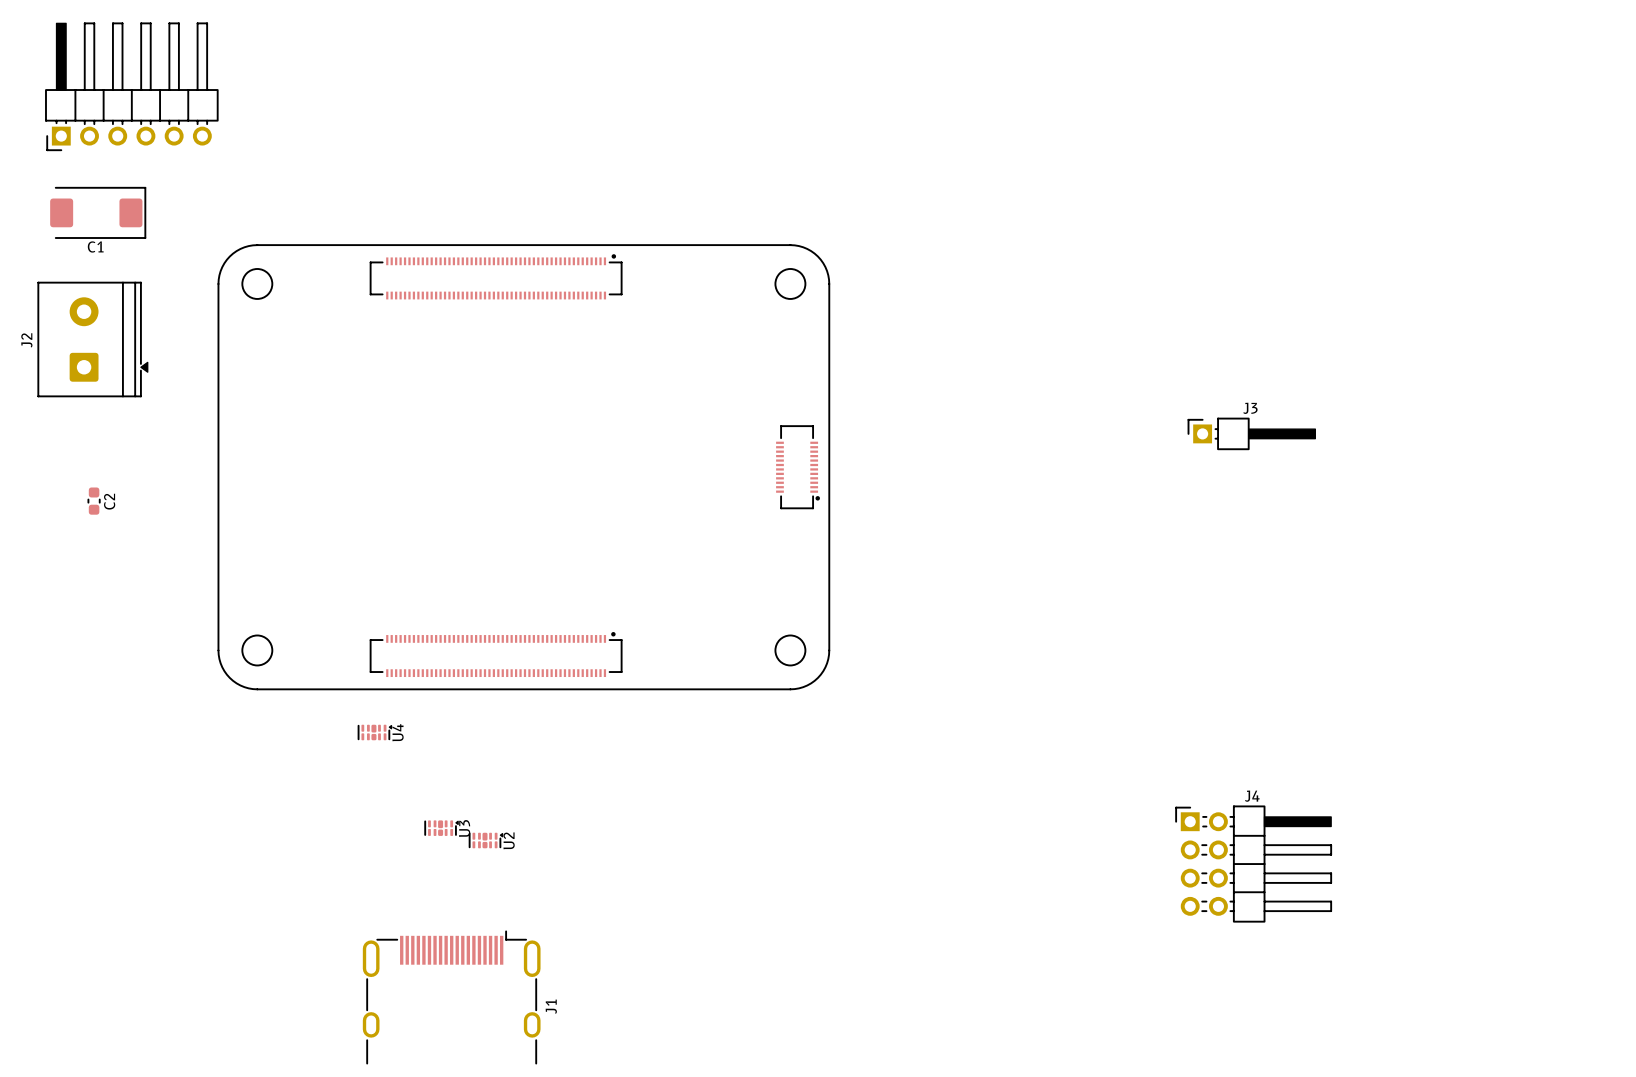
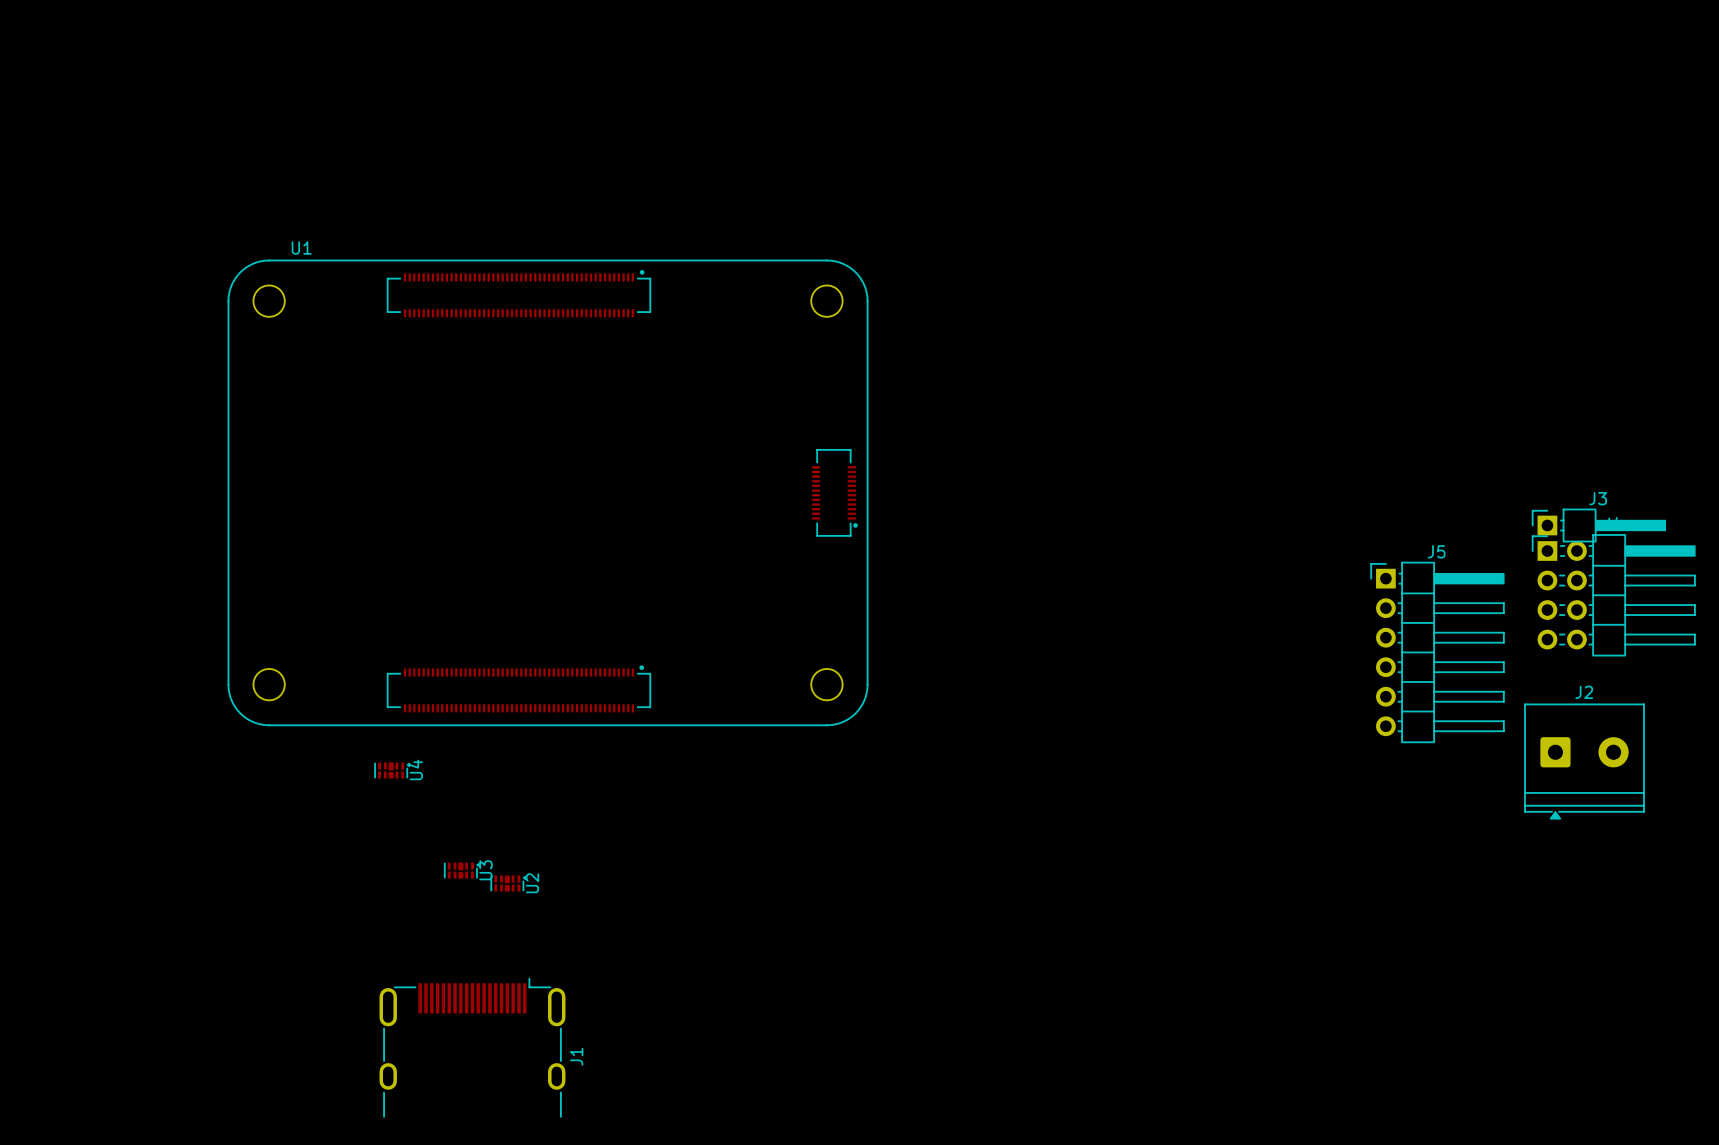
part: (131, 86) -> none
C1: (98, 212) -> none
U1 name: none -> U1 (301, 248)
J2 rotation: 0° (93, 339) -> 90° clockwise (1584, 761)
J2 position: (93, 339) -> (1584, 761)
J3 position: (1251, 433) -> (1599, 525)
C2: (94, 501) -> none
J5: none -> (1437, 652)
J4 position: (1253, 864) -> (1613, 595)

